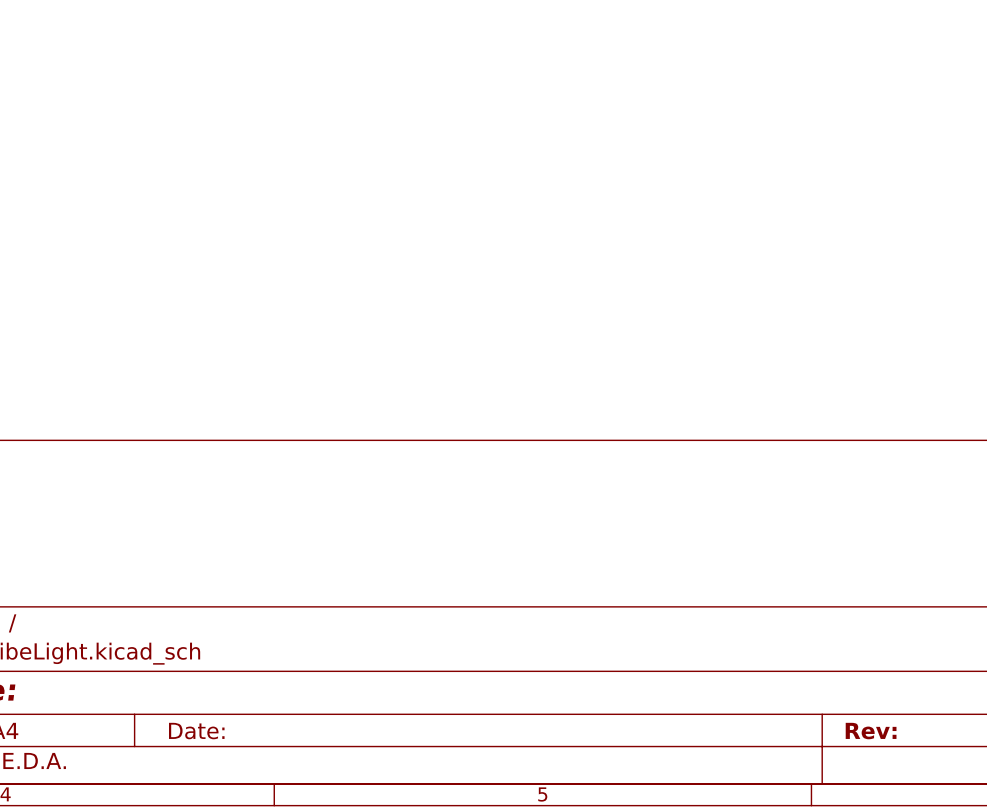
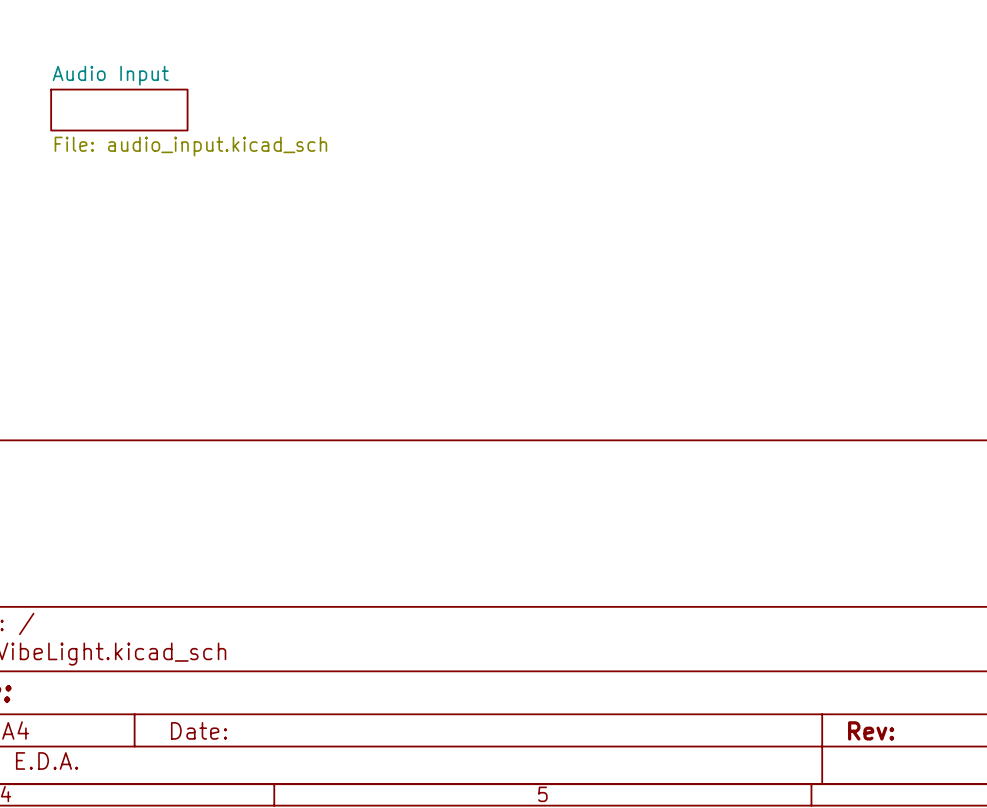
sheet Audio Input: none -> File: audio_input.kicad_sch (119, 110)

